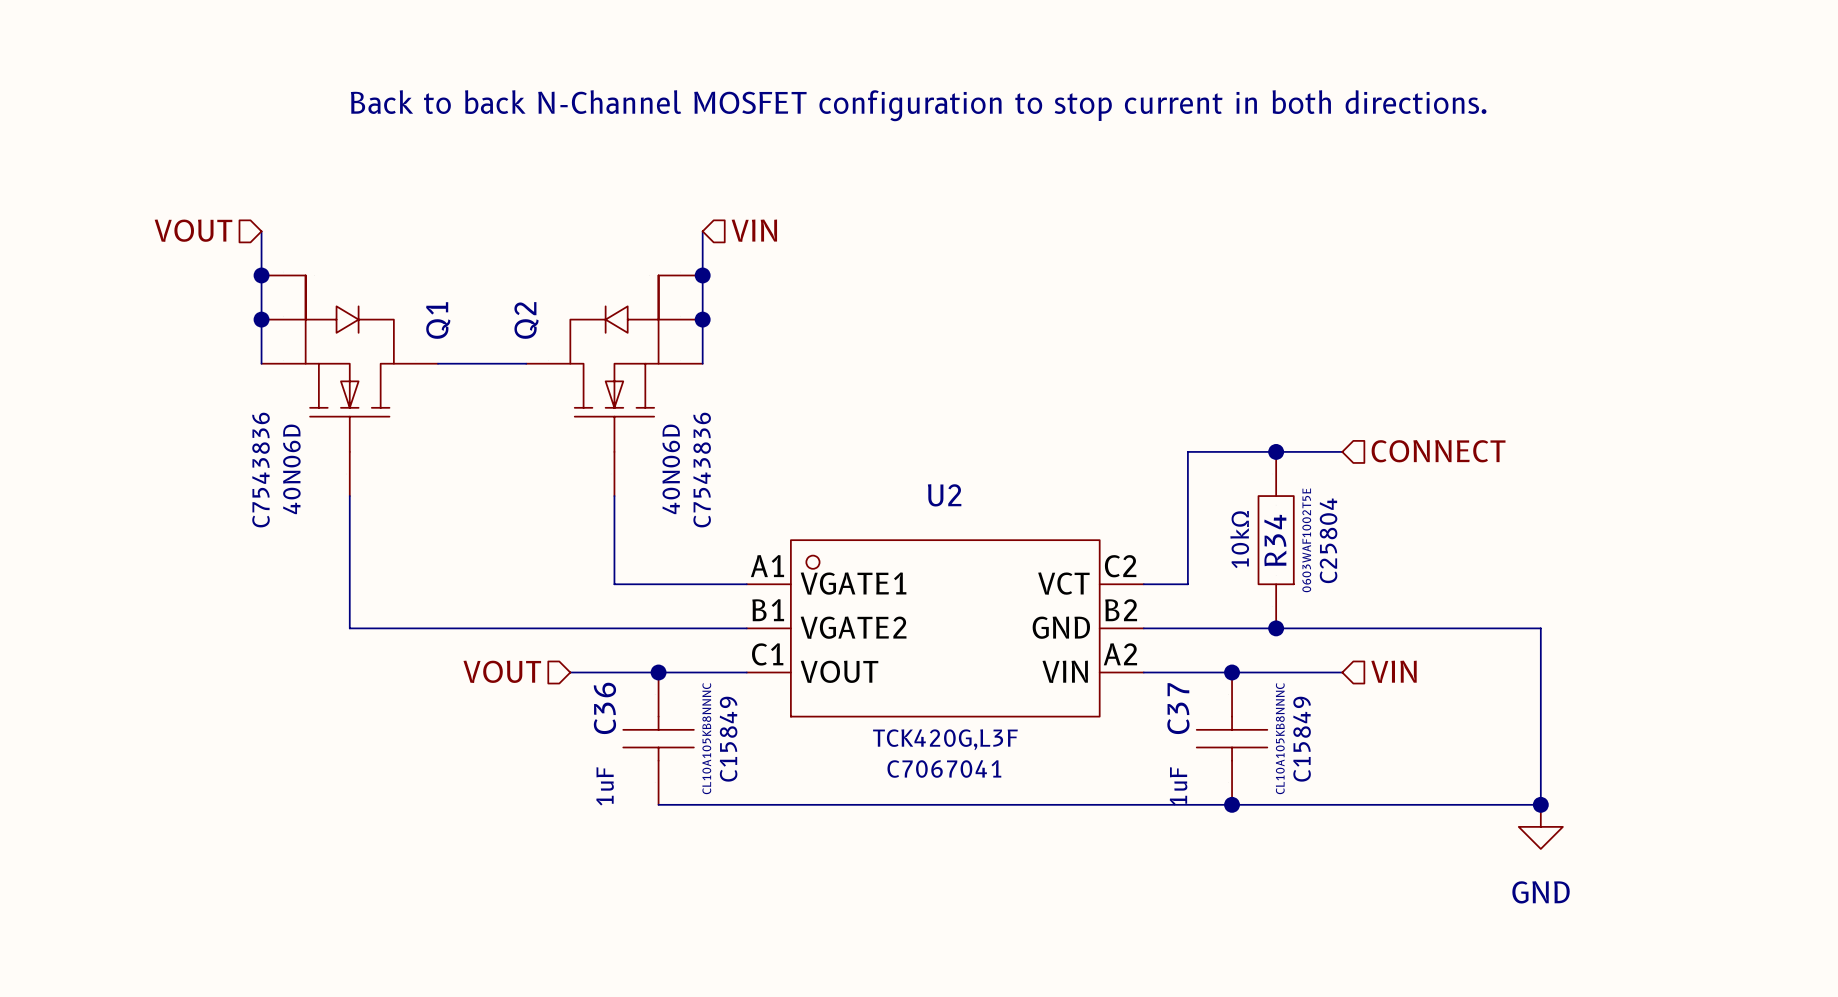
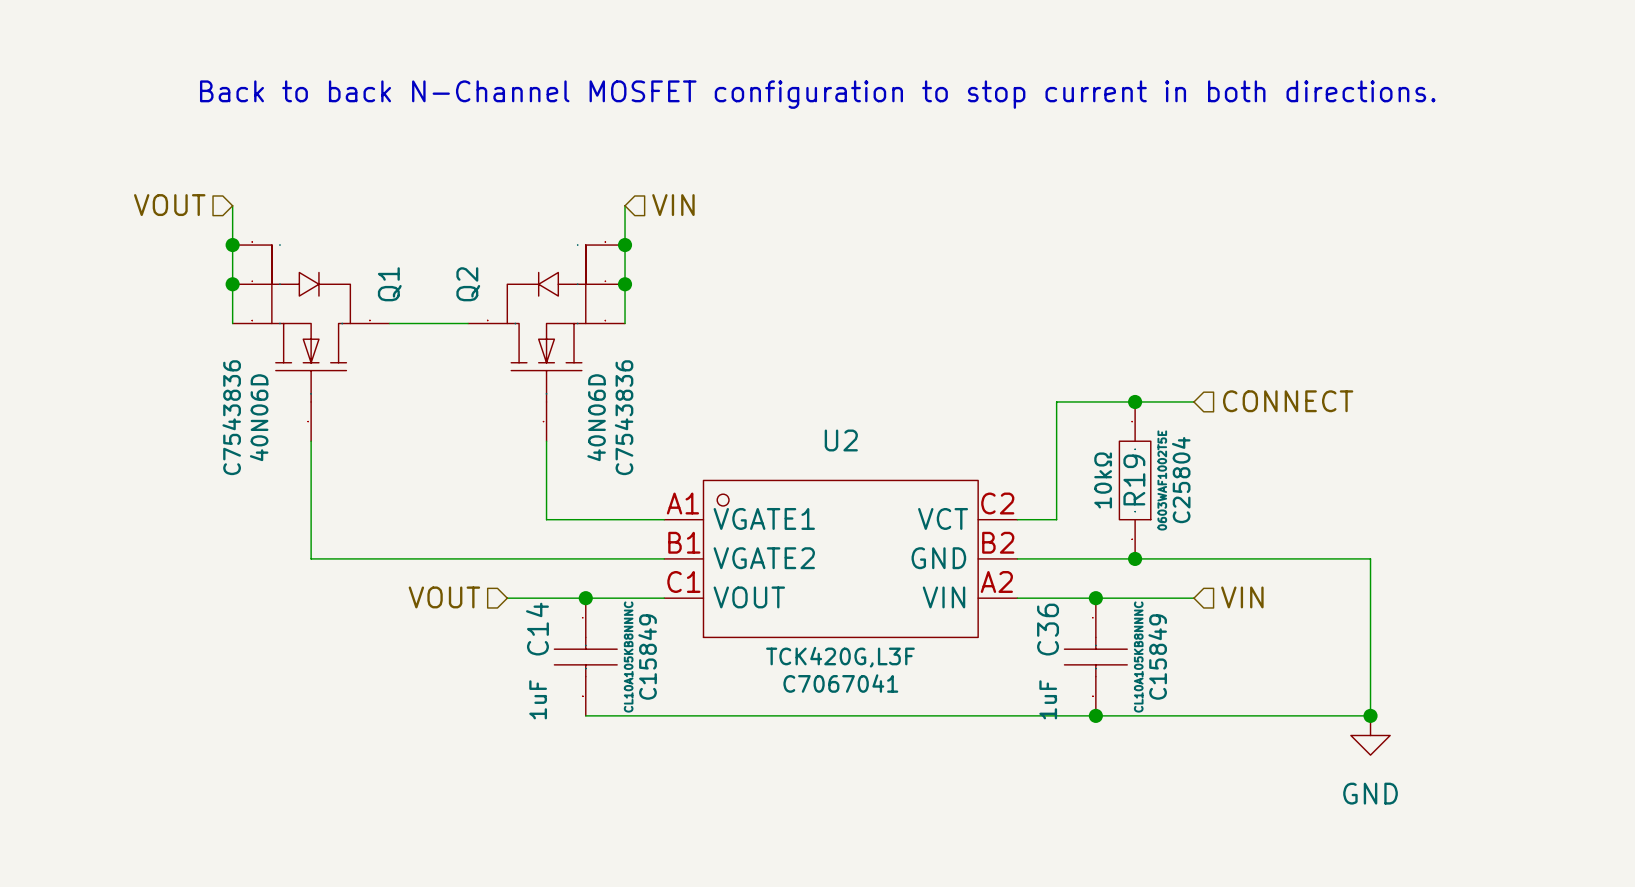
R34 name: R34 (1275, 540) -> R19 (1134, 479)
C36 name: C36 (604, 708) -> C14 (537, 629)
C37 name: C37 (1178, 708) -> C36 (1048, 629)

